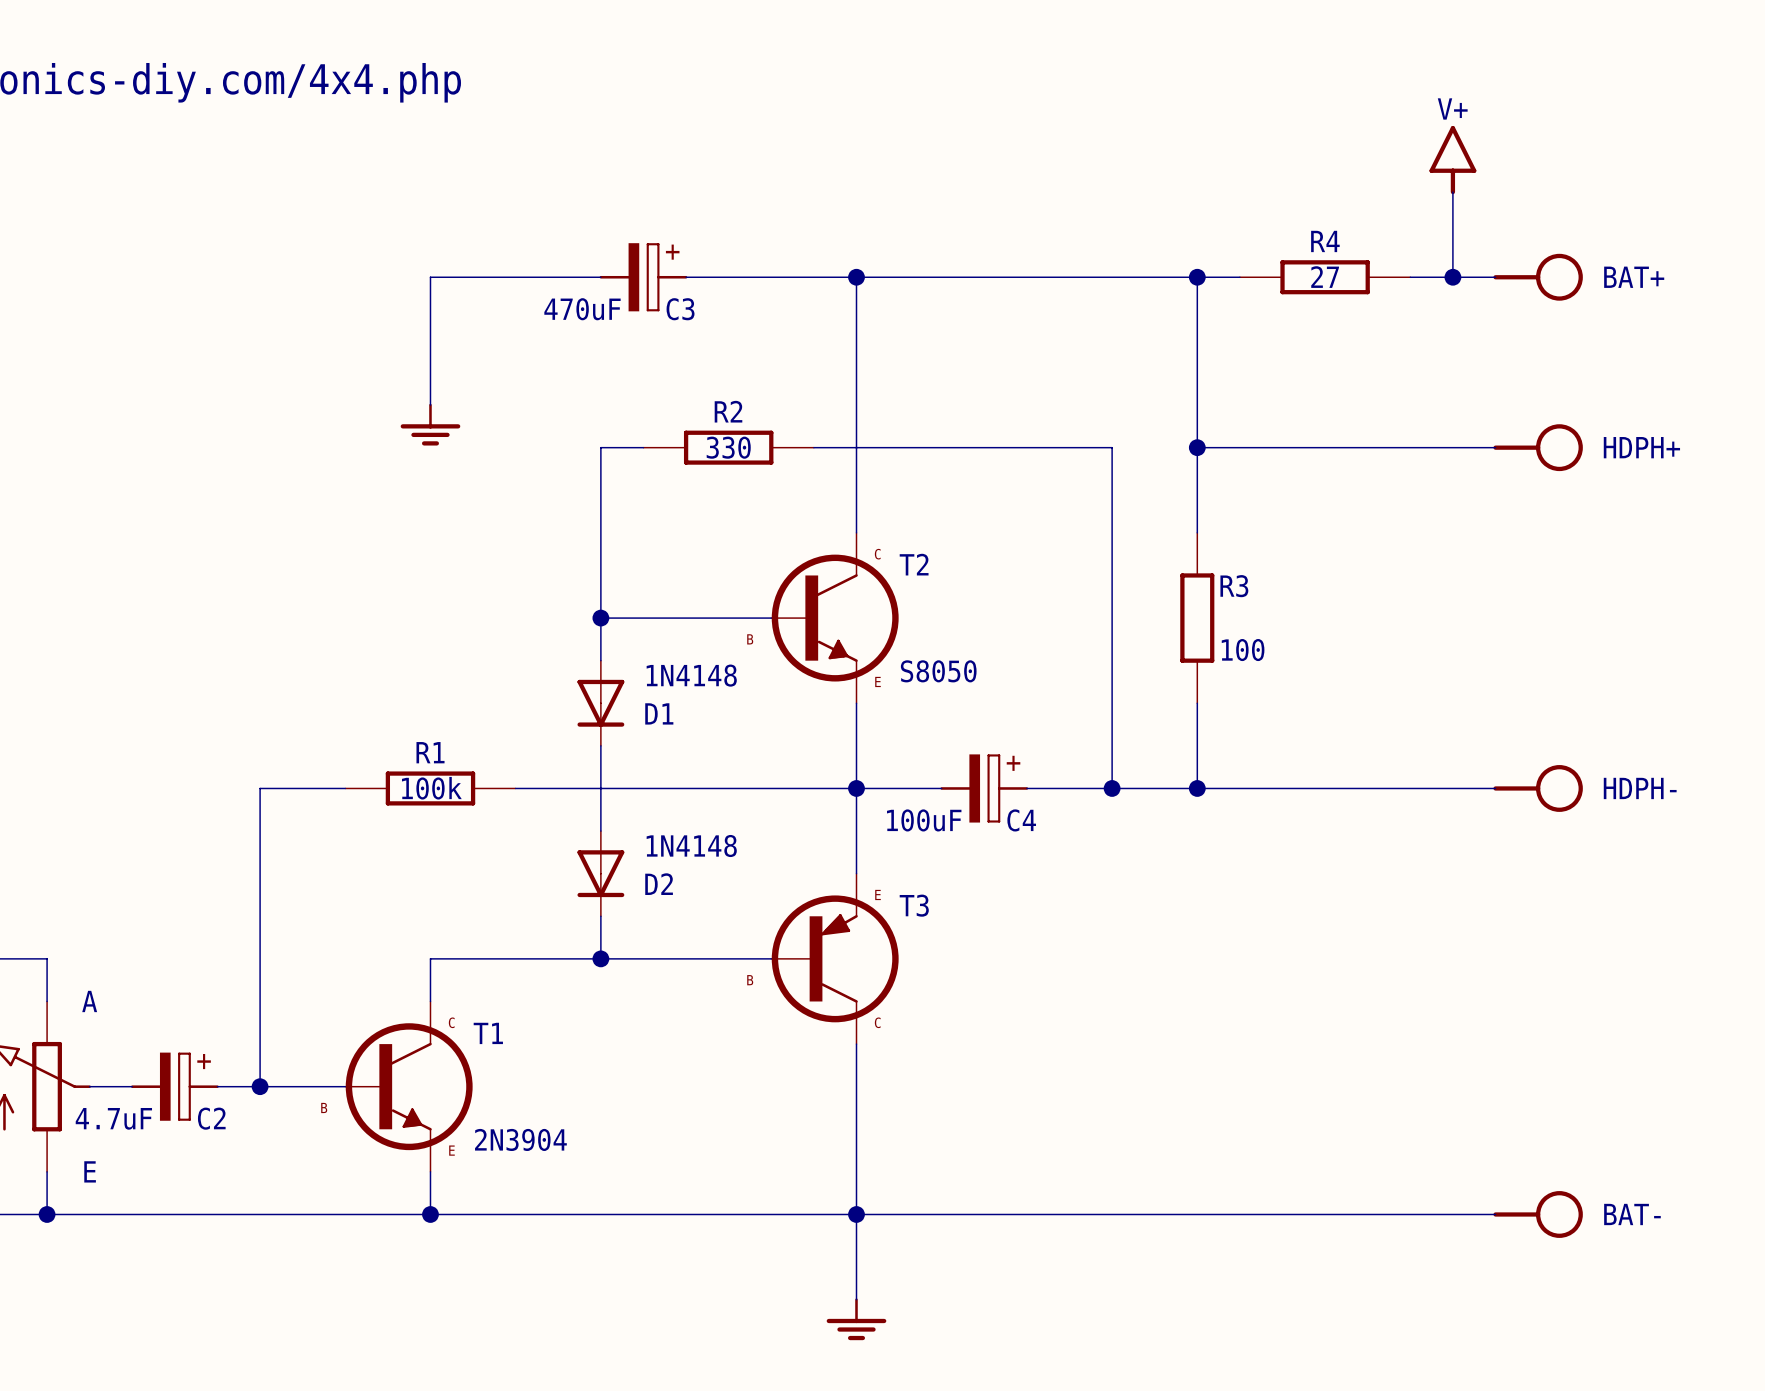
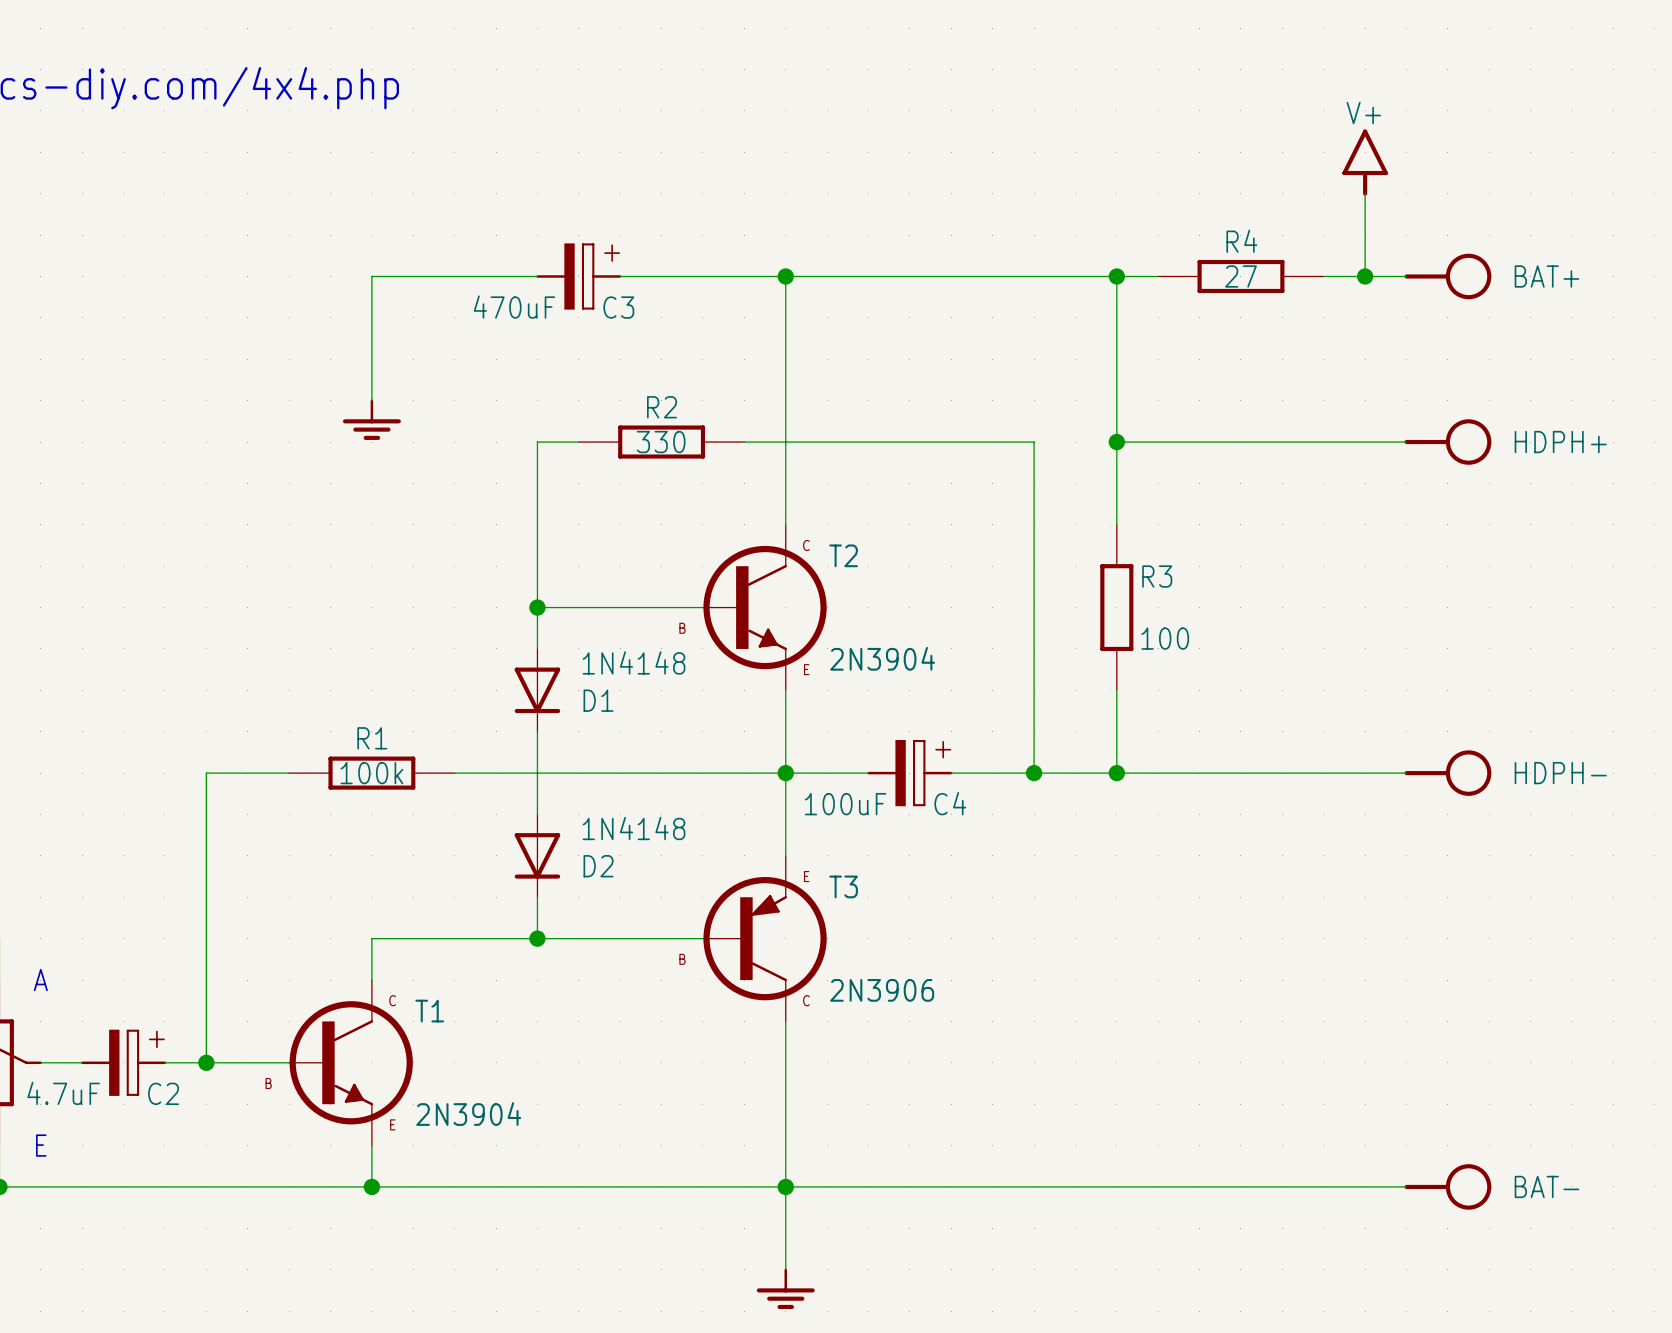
T2 value: S8050 (938, 671) -> 2N3904 (882, 658)
T3 value: none -> 2N3906 (882, 990)

